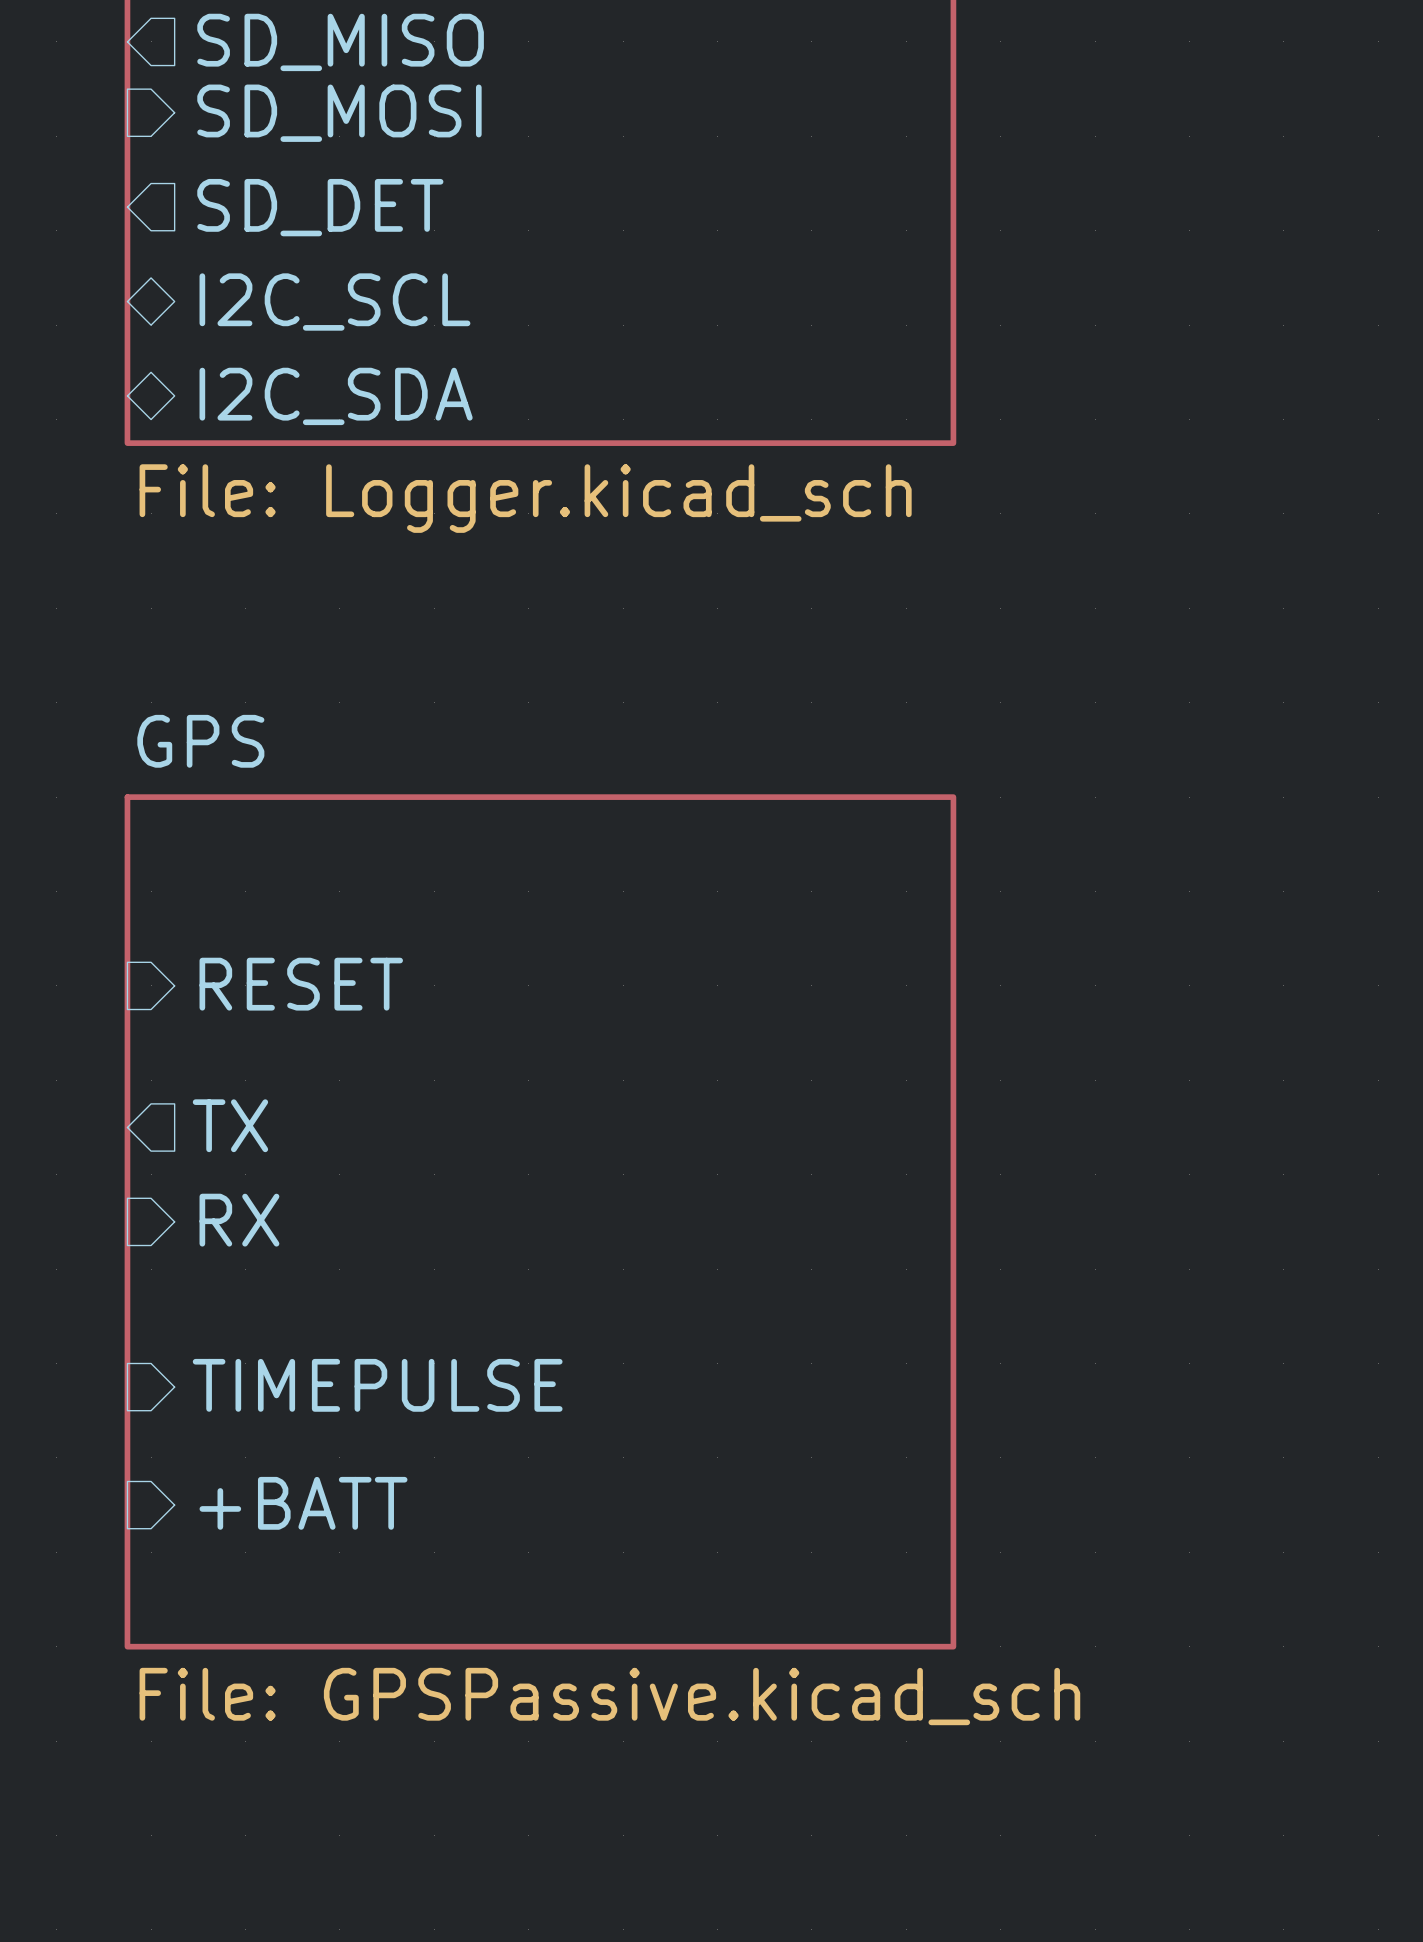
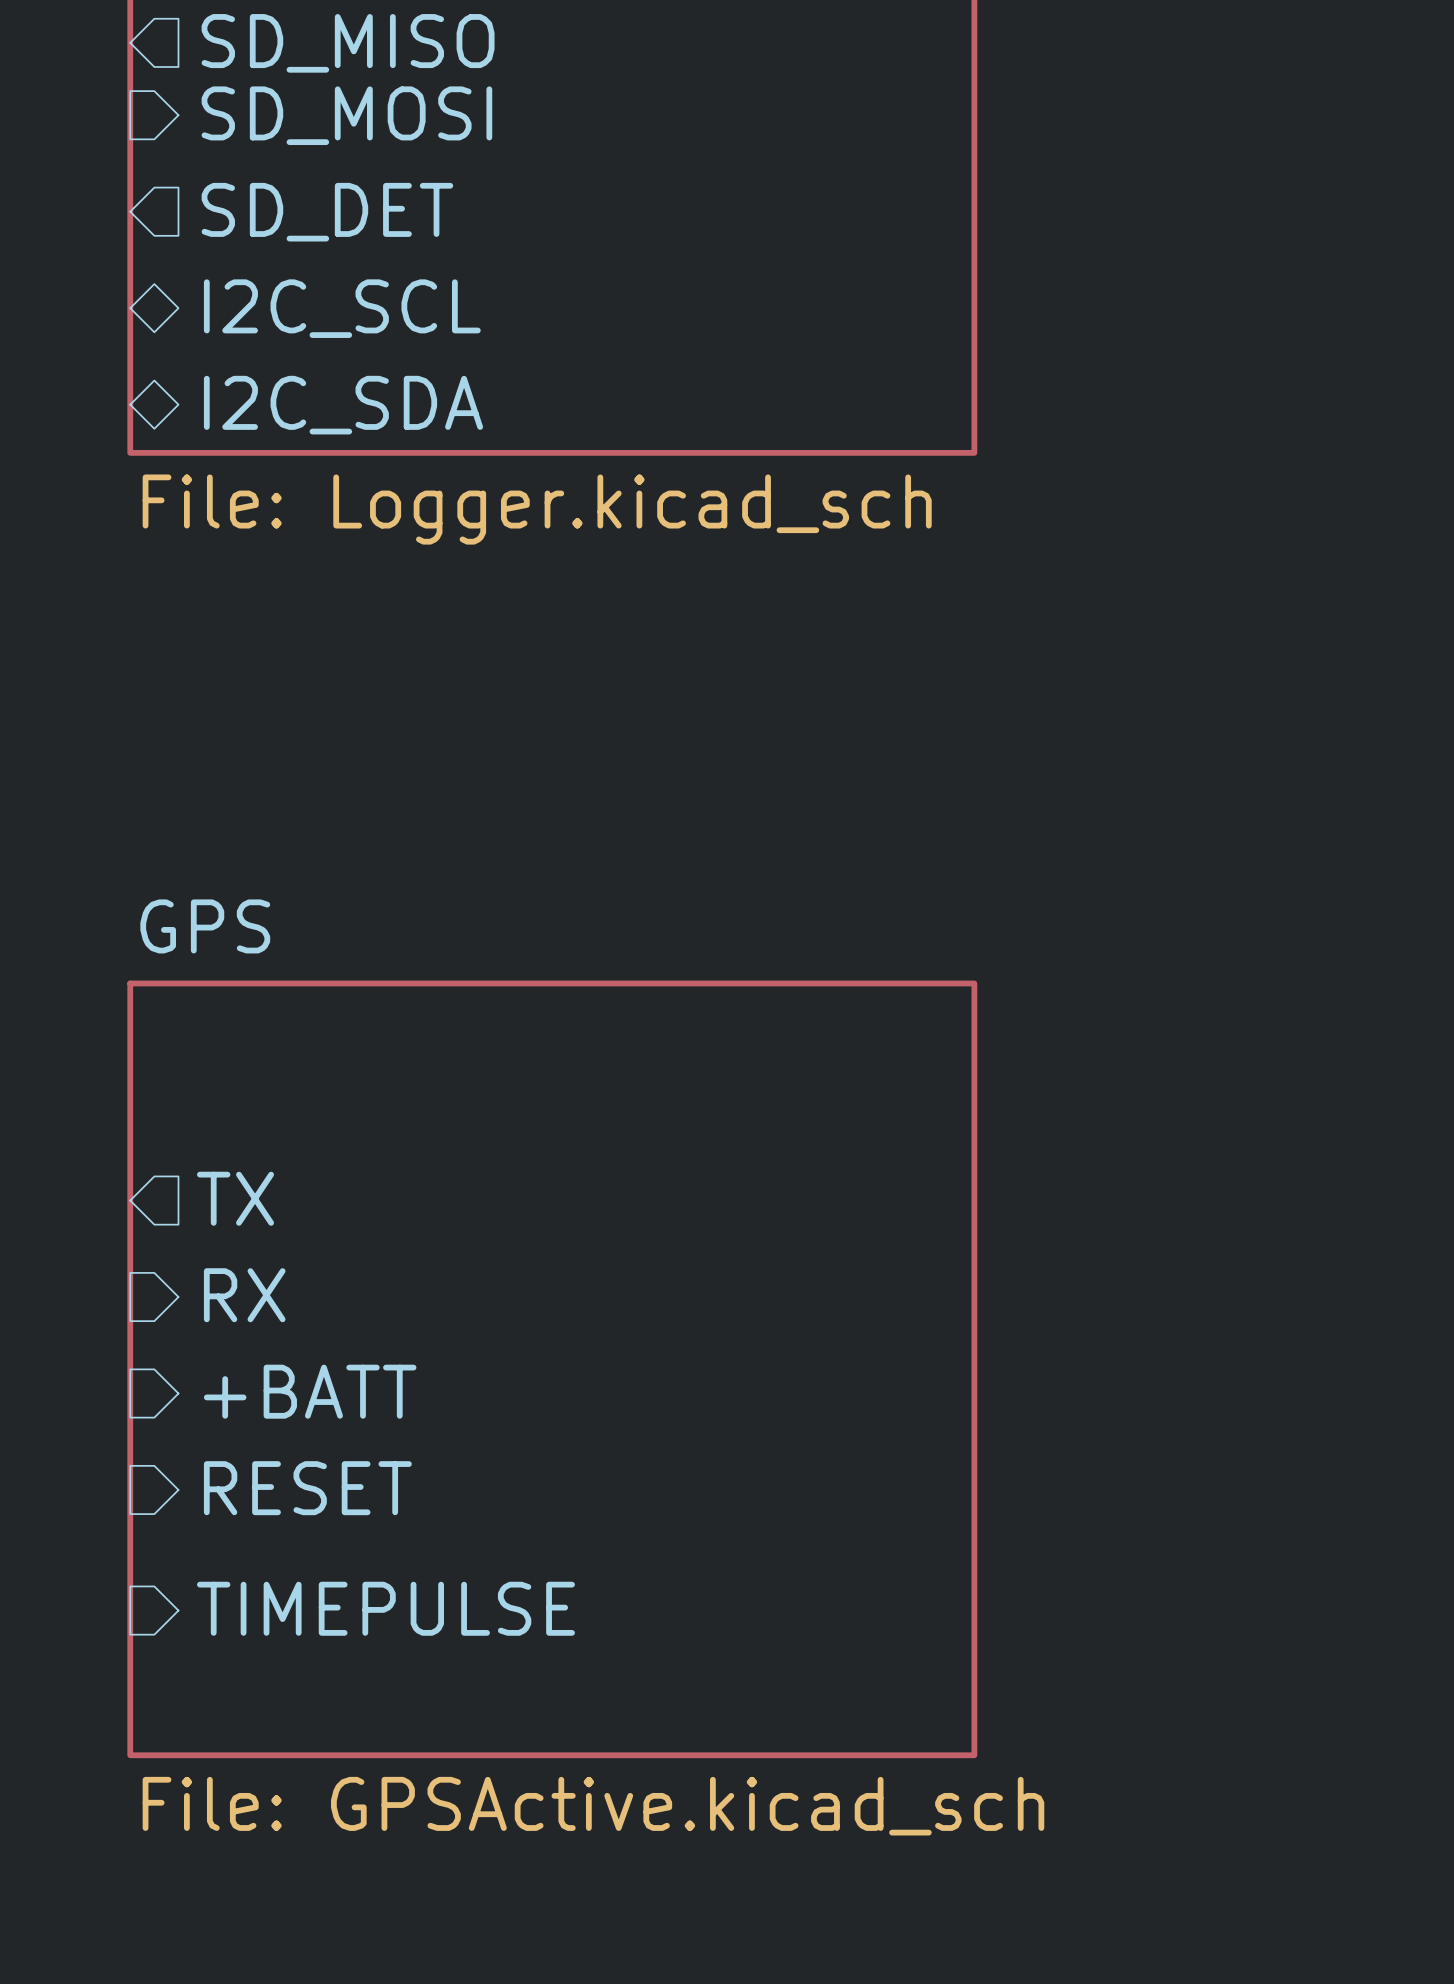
sheet pin position: RESET (301, 984) -> RESET (307, 1488)
sheet pin position: TX (230, 1125) -> TX (235, 1198)
sheet pin position: RX (239, 1220) -> RX (244, 1295)
sheet GPS: File: GPSPassive.kicad_sch (540, 1221) -> none
sheet GPS: none -> File: GPSActive.kicad_sch (552, 1369)
sheet pin position: TIMEPULSE (377, 1385) -> TIMEPULSE (385, 1608)
sheet pin position: +BATT (303, 1503) -> +BATT (310, 1391)

